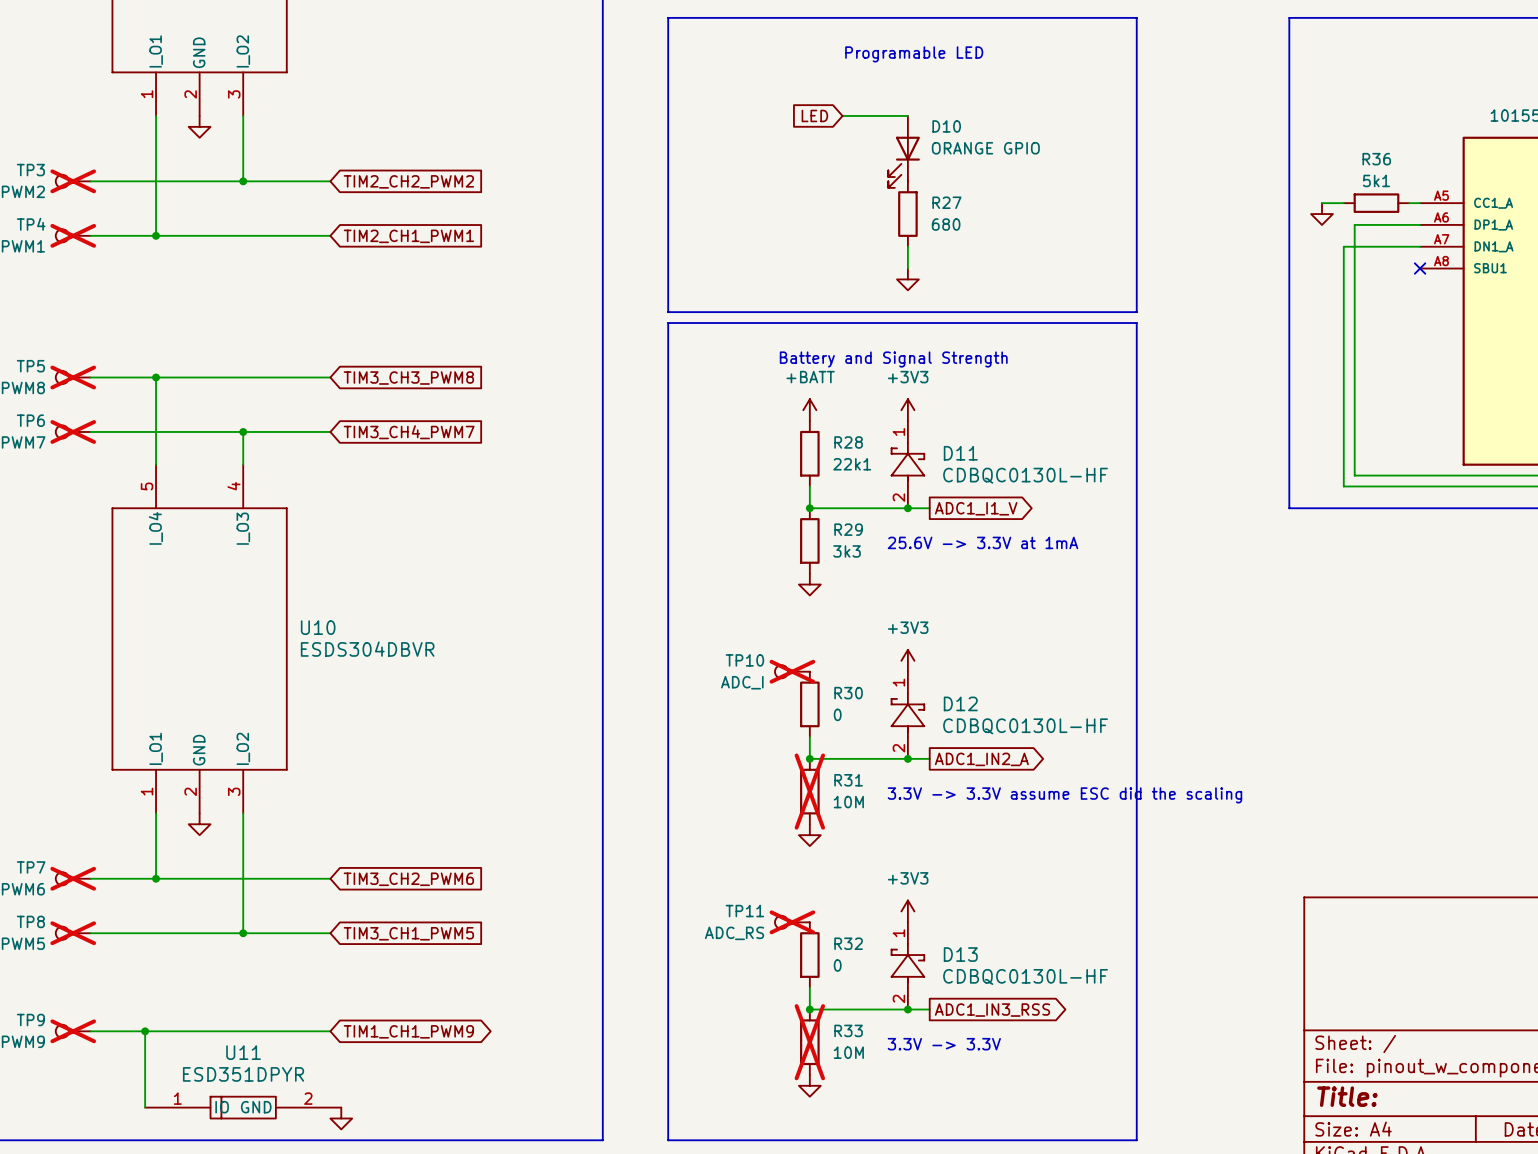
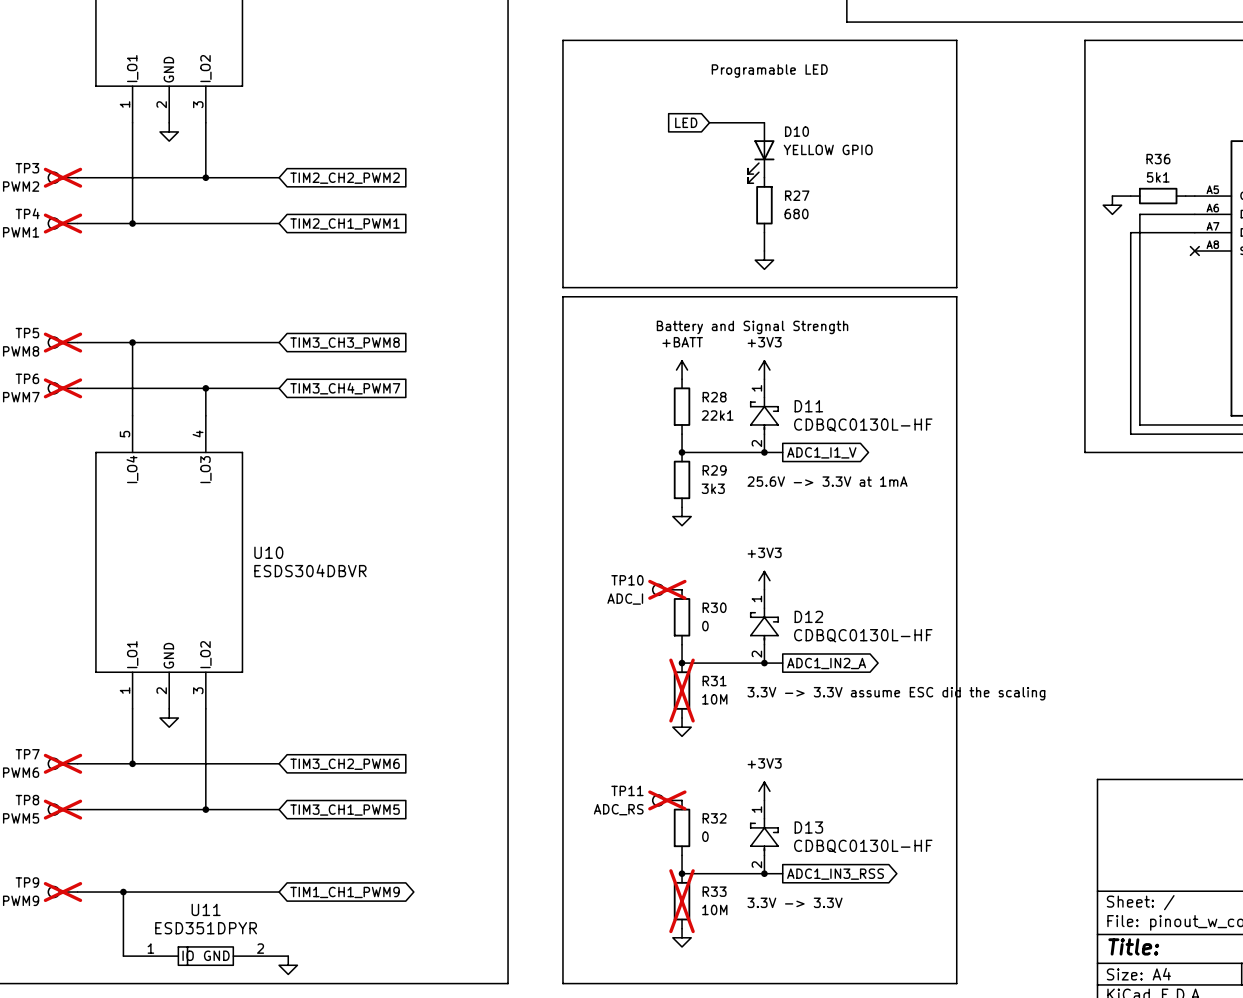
D10 value: ORANGE GPIO (985, 148) -> YELLOW GPIO (828, 149)

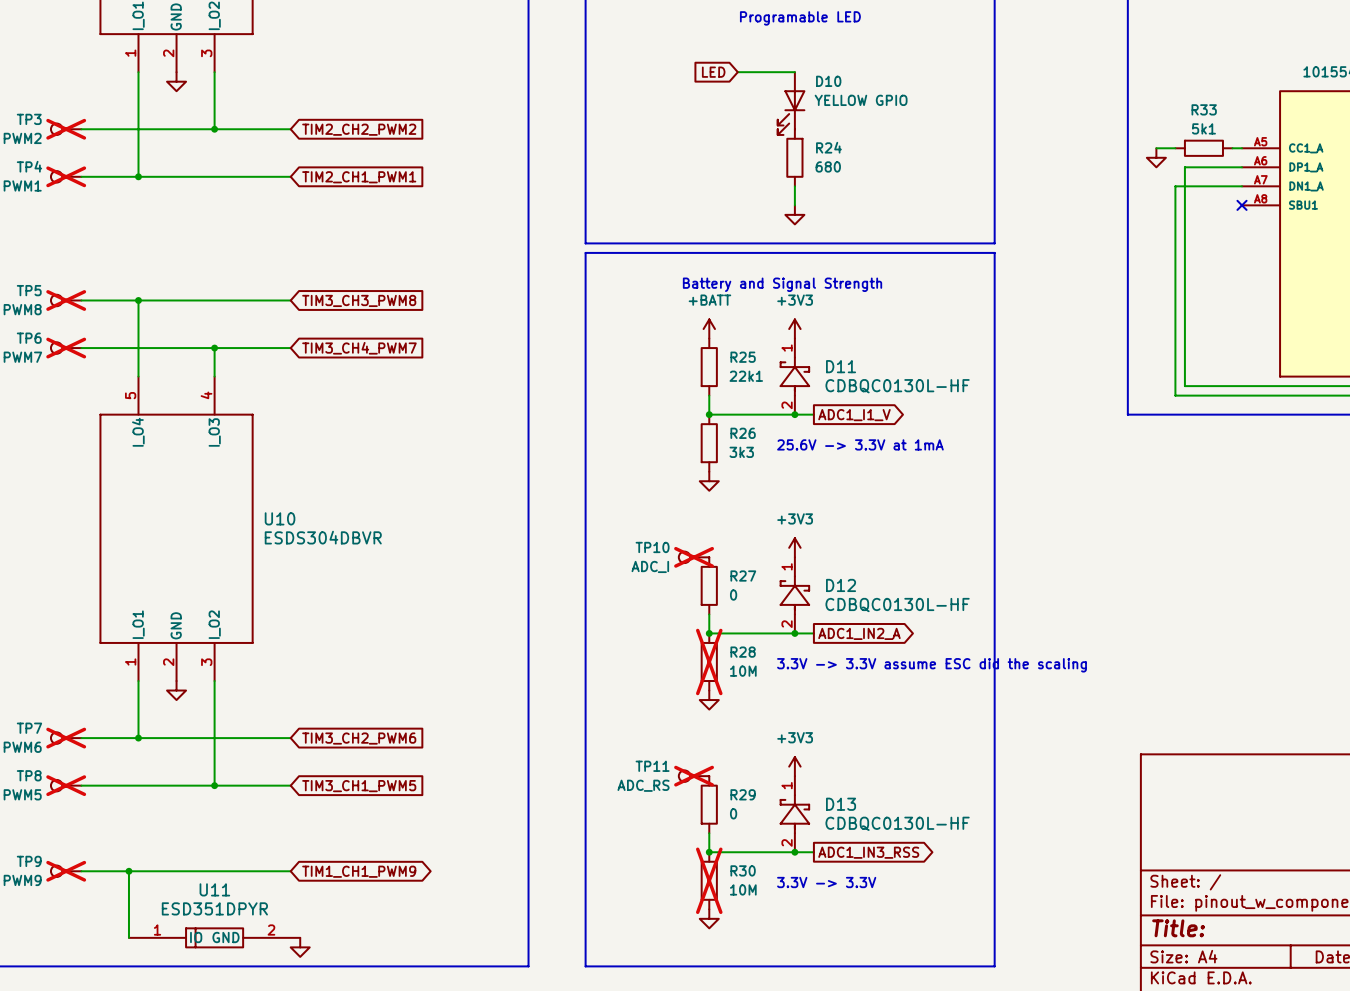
R36 name: R36 (1158, 159) -> R33 (1204, 109)
R27 name: R27 (797, 195) -> R24 (828, 147)
R28 name: R28 (714, 397) -> R25 (743, 357)
R29 name: R29 (714, 470) -> R26 (743, 433)
R30 name: R30 (714, 607) -> R27 (743, 576)
R31 name: R31 (714, 681) -> R28 (743, 652)
R32 name: R32 (714, 818) -> R29 (743, 794)
R33 name: R33 (714, 891) -> R30 (743, 870)

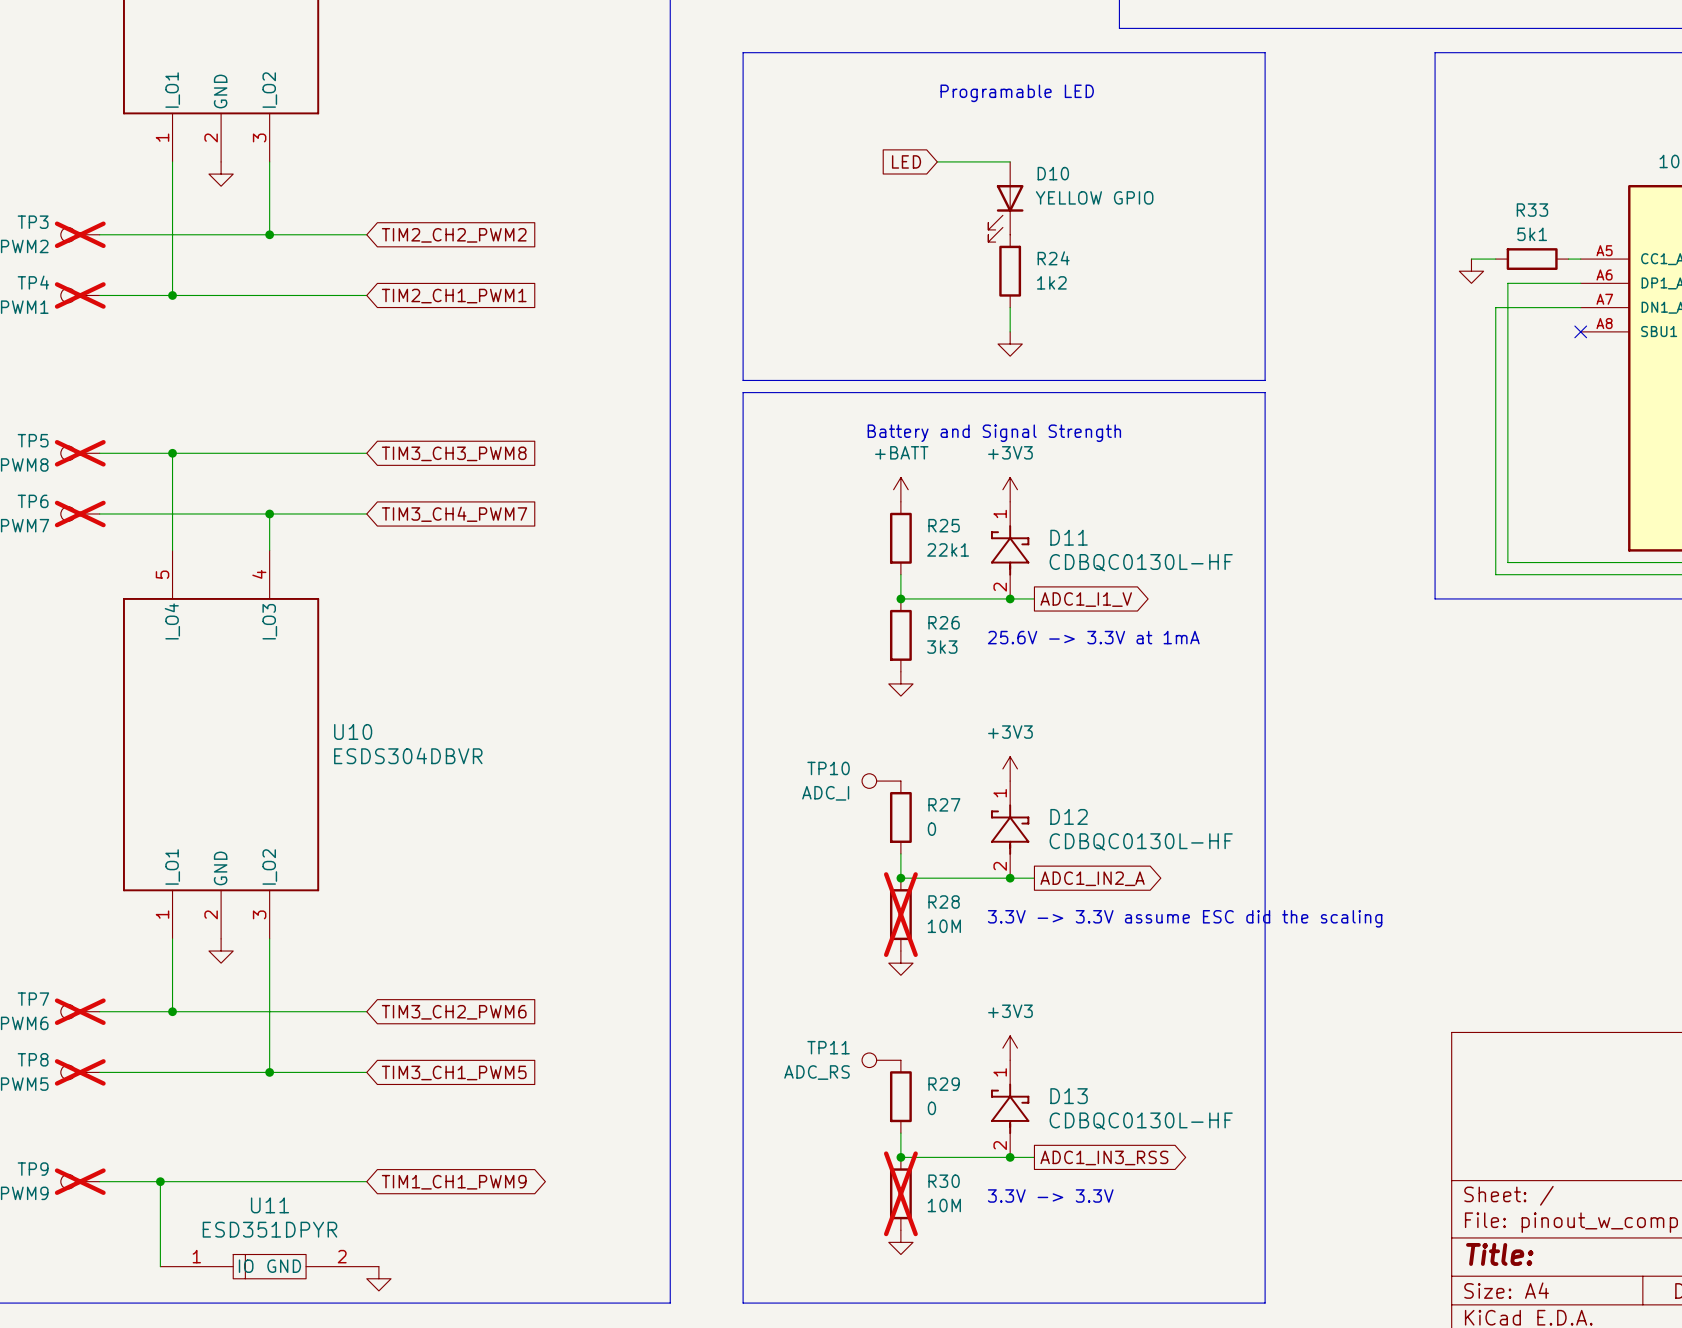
R24 value: 680 (828, 166) -> 1k2 (1051, 282)
TP10 do-not-place cross: (694, 557) -> none
TP11 do-not-place cross: (694, 776) -> none

